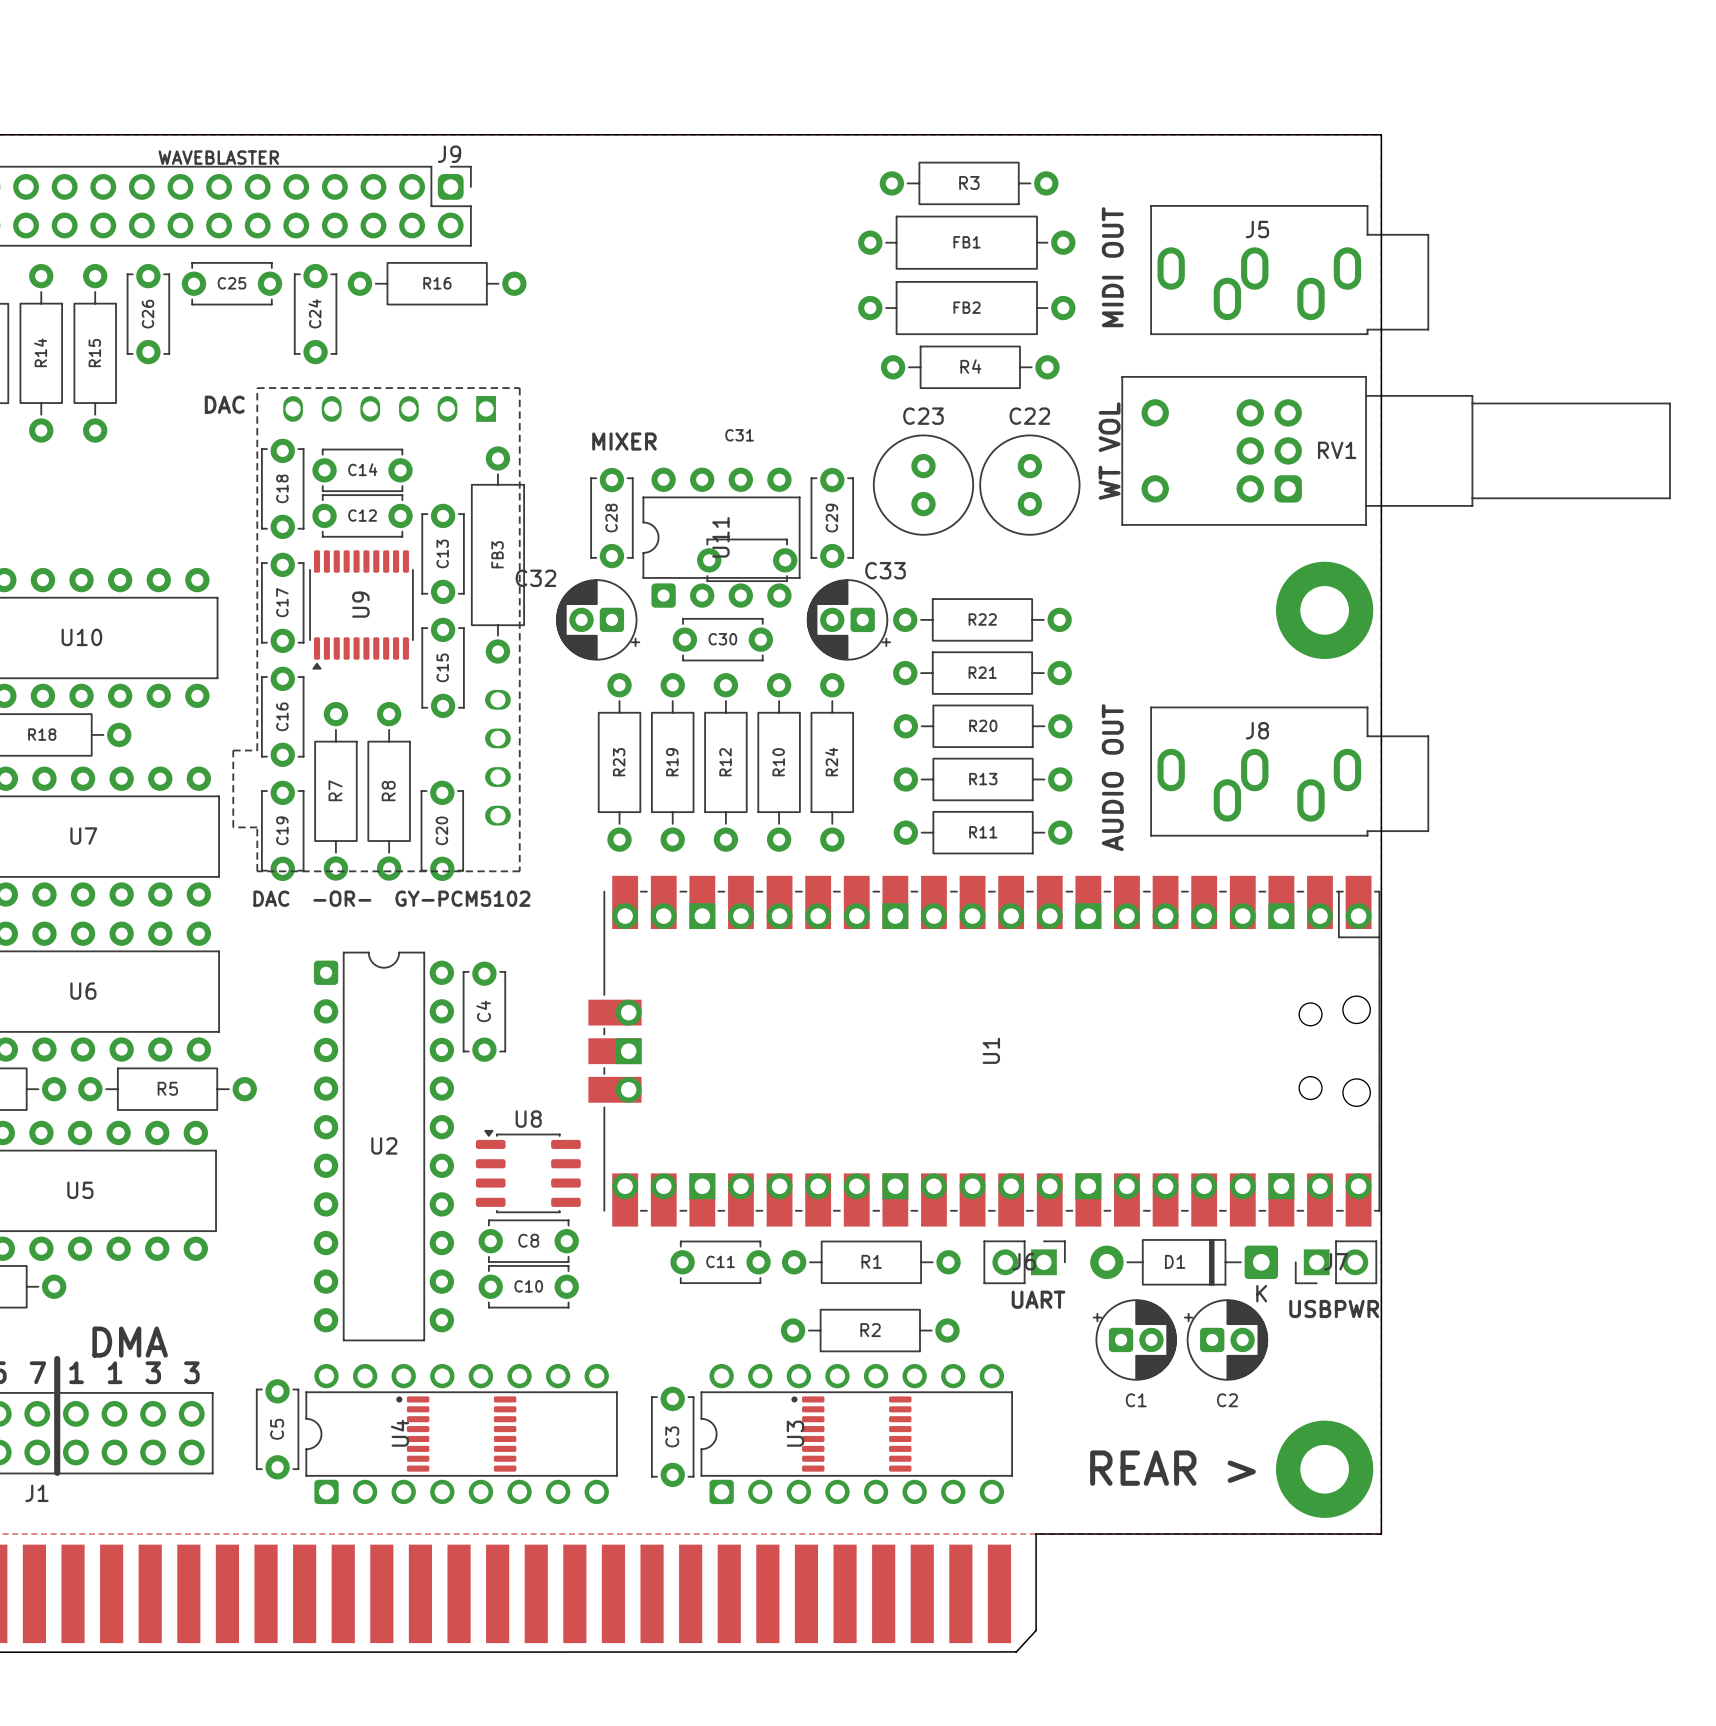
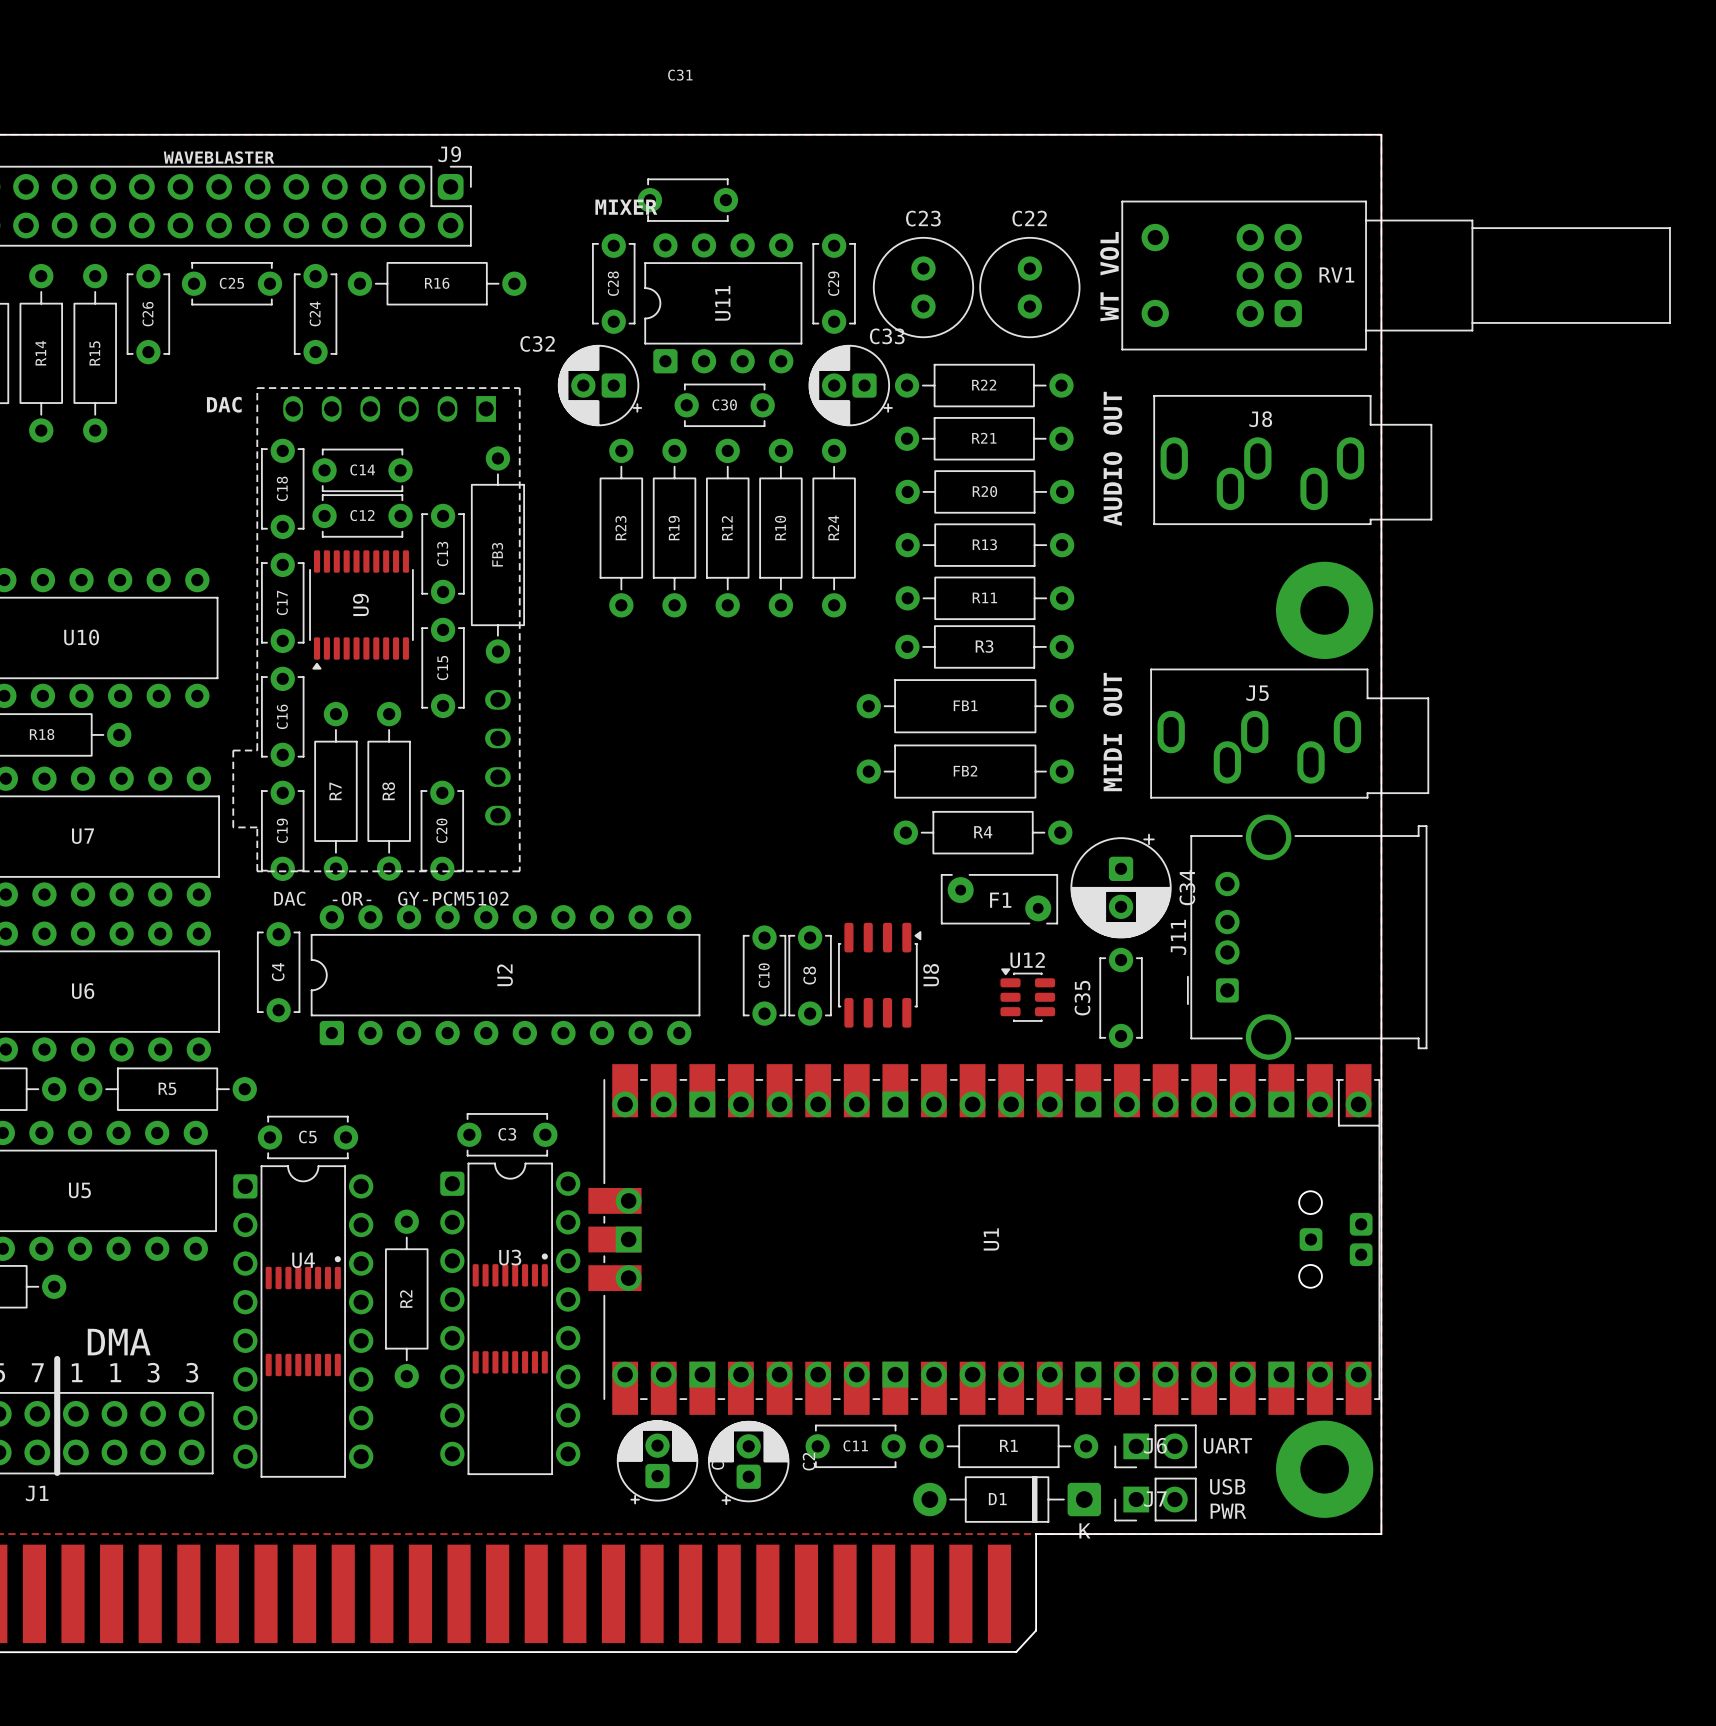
R3 position: (969, 183) -> (984, 646)
FB1 position: (966, 242) -> (965, 706)
text: MIDI OUT (1112, 267) -> none
J5 position: (1289, 270) -> (1289, 733)
FB2 position: (966, 308) -> (965, 771)
R4: (970, 367) -> none
text position: MIXER (624, 441) -> MIXER (626, 207)
RV1 position: (1396, 450) -> (1396, 275)
text position: WT VOL (1109, 451) -> WT VOL (1109, 276)
C23 position: (923, 485) -> (923, 287)
C22 position: (1029, 485) -> (1029, 287)
C28 position: (611, 518) -> (613, 283)
C29 position: (832, 518) -> (834, 283)
U11 position: (721, 537) -> (723, 303)
C31 position: (747, 560) -> (687, 200)
R11: none -> (984, 598)
C32 position: (598, 619) -> (599, 385)
C33 position: (848, 619) -> (850, 385)
R22 position: (982, 619) -> (984, 385)
C30 position: (722, 639) -> (724, 405)
R21 position: (982, 673) -> (984, 438)
R20 position: (983, 726) -> (984, 491)
text: none -> MIDI OUT (1112, 732)
R23 position: (619, 762) -> (621, 528)
R19 position: (672, 762) -> (674, 528)
R12 position: (725, 762) -> (727, 528)
R10 position: (779, 762) -> (780, 528)
R24 position: (832, 762) -> (834, 528)
J8 position: (1289, 771) -> (1292, 460)
text position: AUDIO OUT (1112, 777) -> AUDIO OUT (1112, 458)
R13 position: (983, 779) -> (984, 545)
R11 name: R11 (983, 832) -> R4 (983, 832)
U1 footprint: [588, 875, 1381, 1227] -> [588, 1064, 1381, 1415]
C34: none -> (1121, 886)
F1: none -> (999, 899)
J11: none -> (1307, 937)
U12: none -> (1027, 995)
C35: none -> (1121, 998)
C4 position: (484, 1011) -> (278, 972)
U2 rotation: 0° (383, 1146) -> 90° counterclockwise (505, 975)
U8 rotation: 0° (528, 1171) -> 90° clockwise (879, 975)
U8 position: (528, 1171) -> (879, 975)
C8 rotation: 0° (528, 1241) -> 90° clockwise (810, 975)
C8 position: (528, 1241) -> (810, 975)
C11 position: (720, 1262) -> (855, 1446)
R1 position: (871, 1262) -> (1008, 1446)
J6 rotation: 0° (1024, 1262) -> 180° (1155, 1446)
J6 position: (1024, 1262) -> (1155, 1446)
D1 position: (1184, 1262) -> (1007, 1499)
J7 position: (1336, 1262) -> (1155, 1499)
C10 rotation: 0° (528, 1286) -> 90° clockwise (764, 975)
C10 position: (528, 1286) -> (764, 975)
text position: UART (1038, 1299) -> UART (1227, 1445)
text: USBPWR (1334, 1308) -> none
R2 rotation: 0° (870, 1330) -> 90° clockwise (406, 1298)
R2 position: (870, 1330) -> (406, 1298)
C1 rotation: 0° (1134, 1339) -> 90° counterclockwise (657, 1462)
C1 position: (1134, 1339) -> (657, 1462)
C2 rotation: 0° (1226, 1339) -> 90° counterclockwise (748, 1462)
C2 position: (1226, 1339) -> (748, 1462)
C5 rotation: 0° (277, 1429) -> 90° clockwise (307, 1137)
C5 position: (277, 1429) -> (307, 1137)
U4 rotation: 0° (461, 1434) -> 90° clockwise (303, 1321)
U4 position: (461, 1434) -> (303, 1321)
U3 rotation: 0° (856, 1434) -> 90° clockwise (510, 1318)
U3 position: (856, 1434) -> (510, 1318)
C3 rotation: 0° (672, 1436) -> 90° clockwise (507, 1134)
C3 position: (672, 1436) -> (507, 1134)
text: REAR > (1172, 1468) -> none
text: none -> USB (1227, 1486)
text: none -> PWR (1228, 1511)

